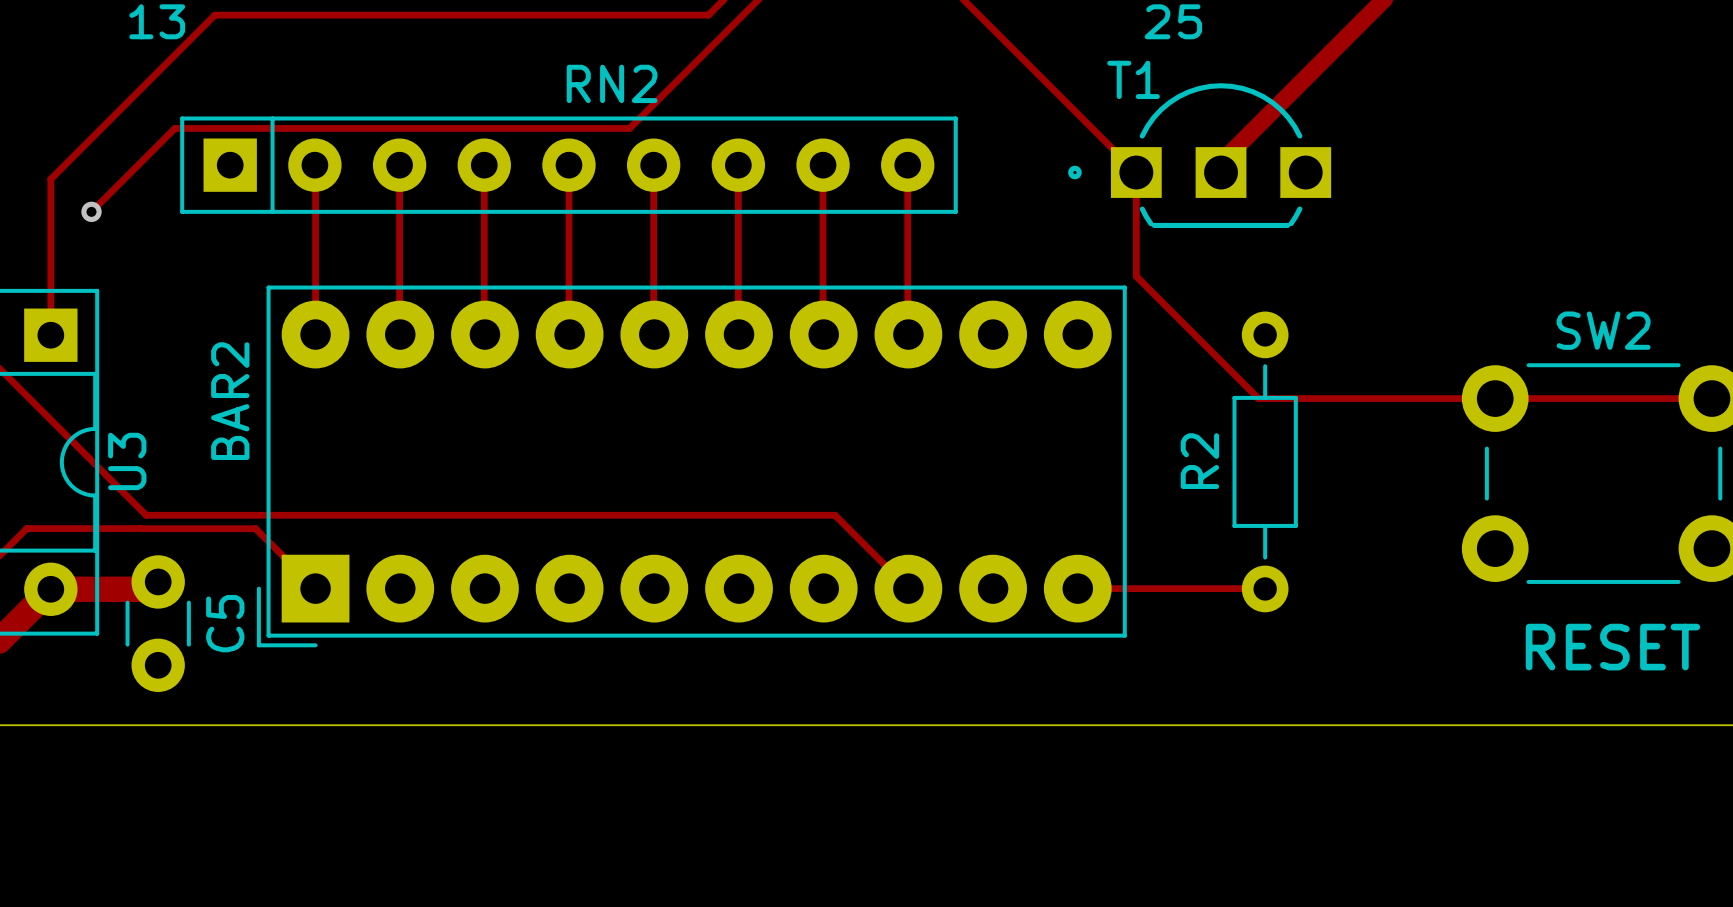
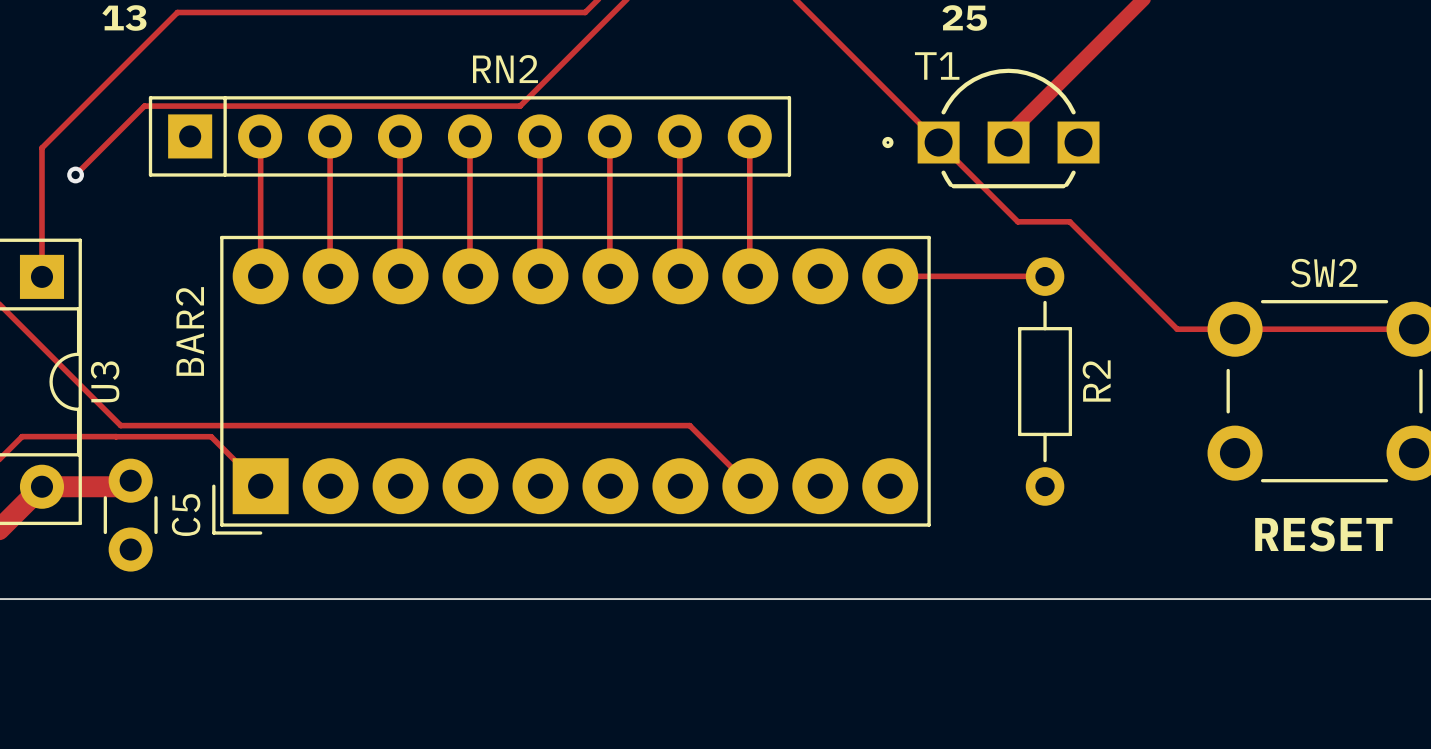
track: (1136, 172) (1136, 276) (1258, 398) (1425, 398) -> (938, 142) (1017, 221) (1069, 221) (1177, 329)
track: none -> (1042, 273) (1039, 276) (890, 276)
R2 name position: R2 (1199, 461) -> R2 (1096, 381)
track: (1077, 588) (1264, 588) -> none

